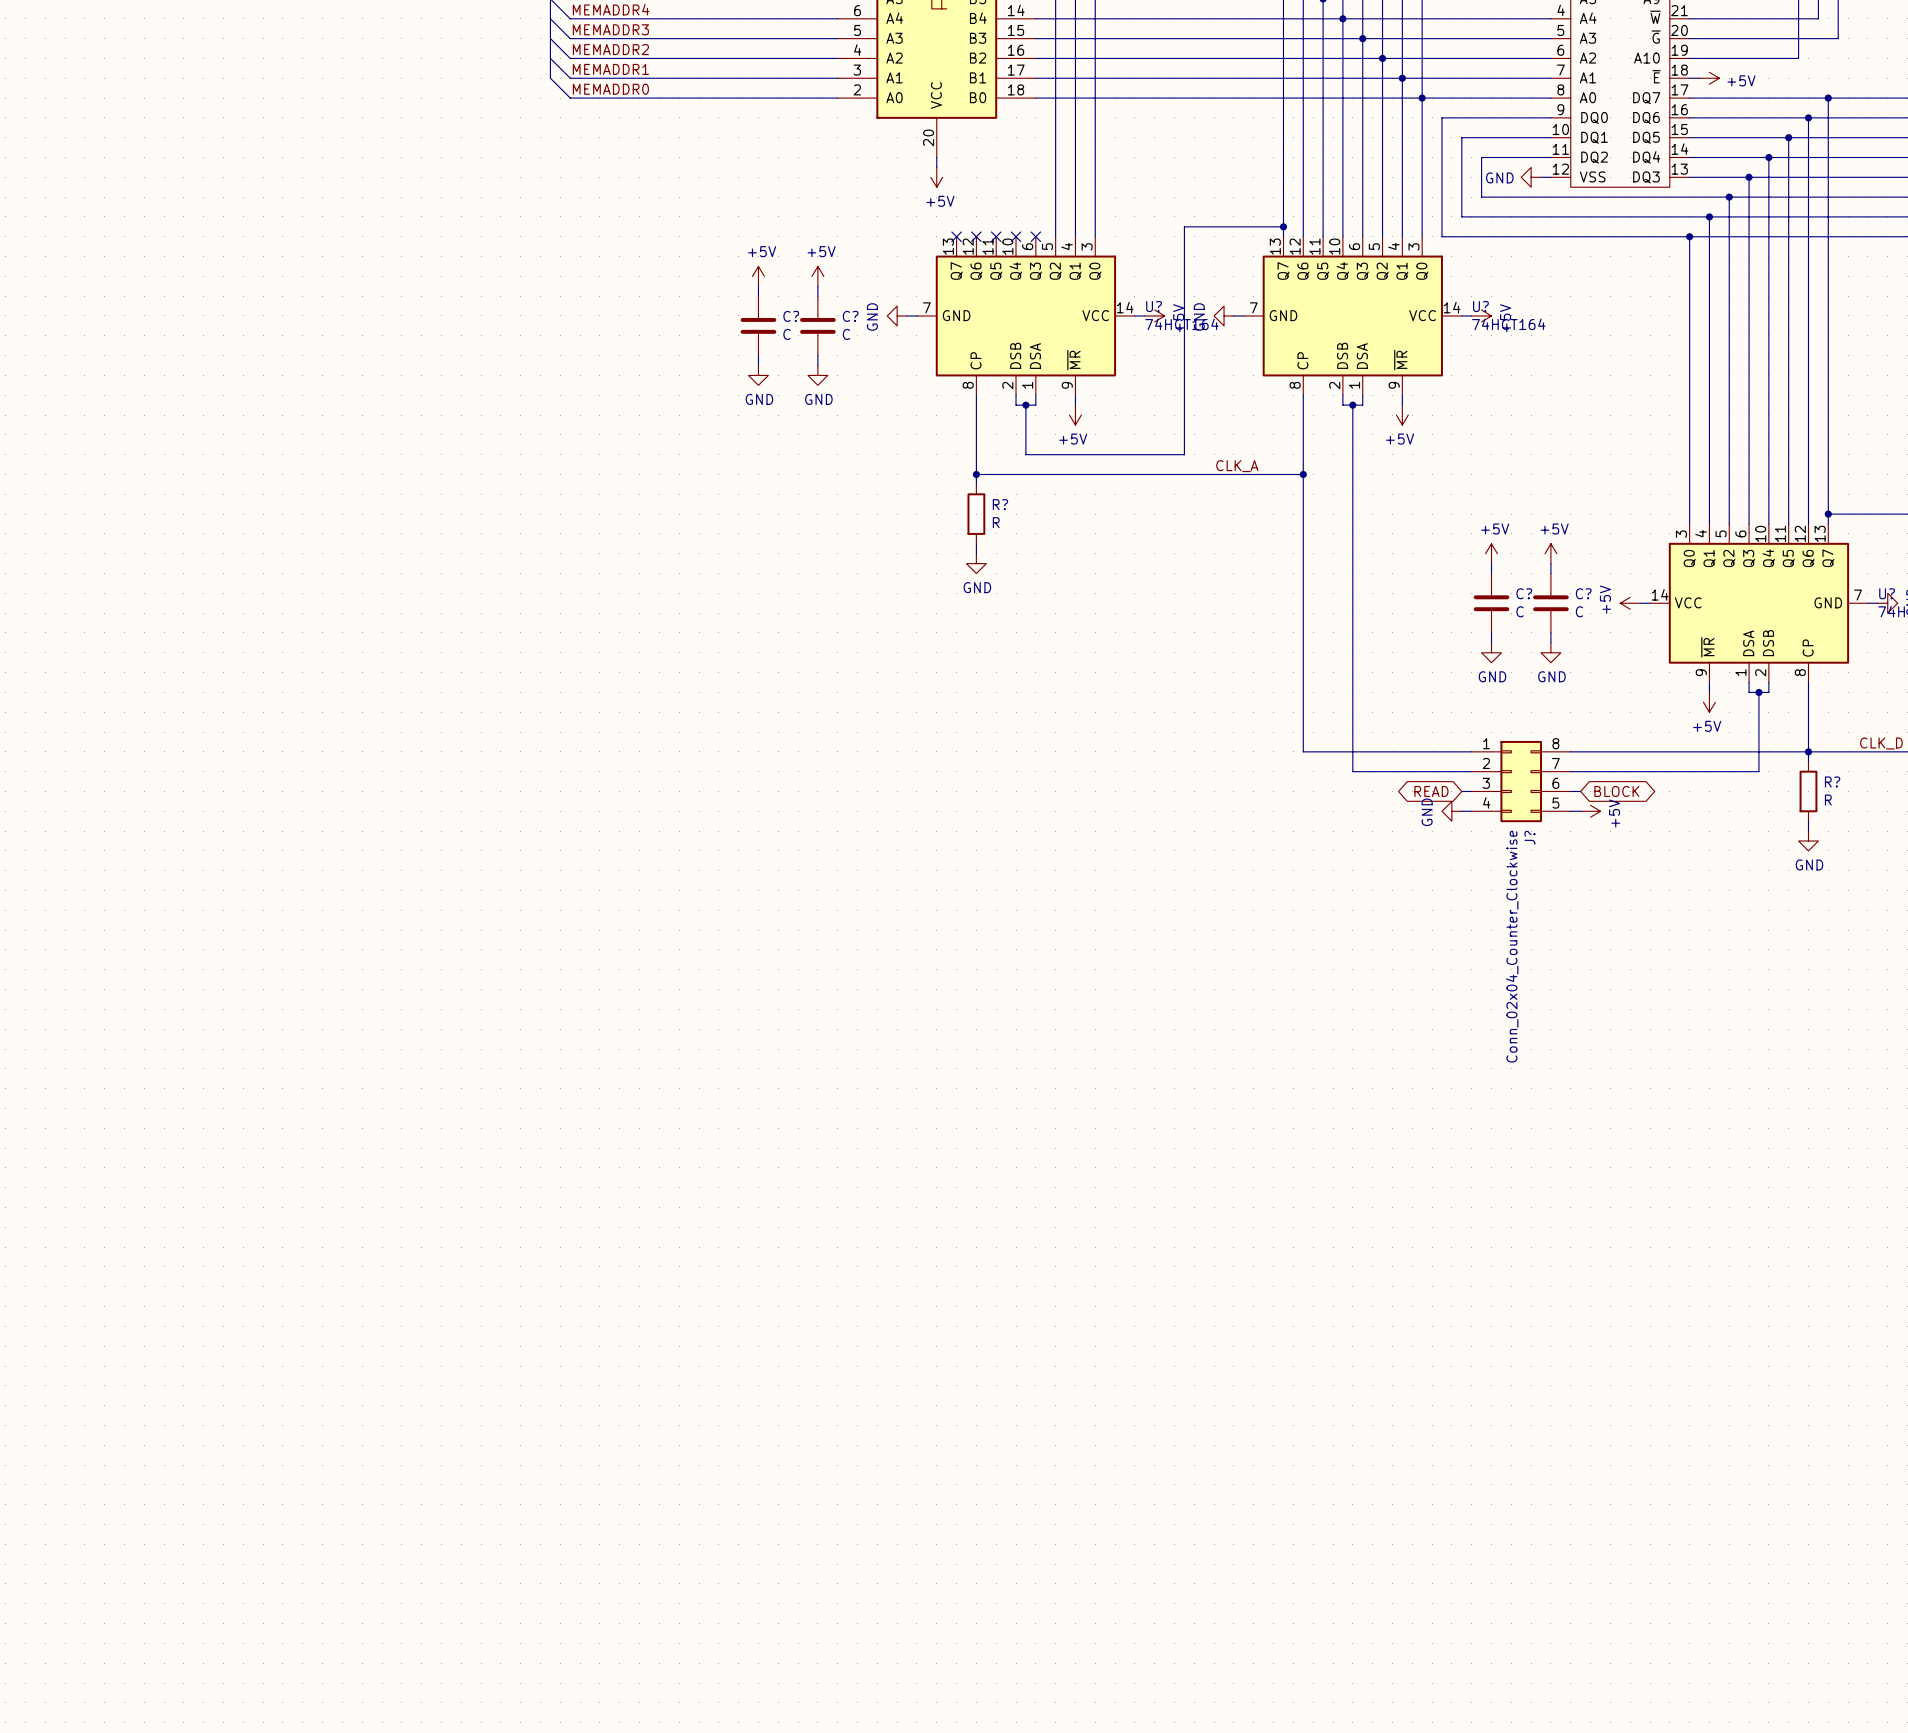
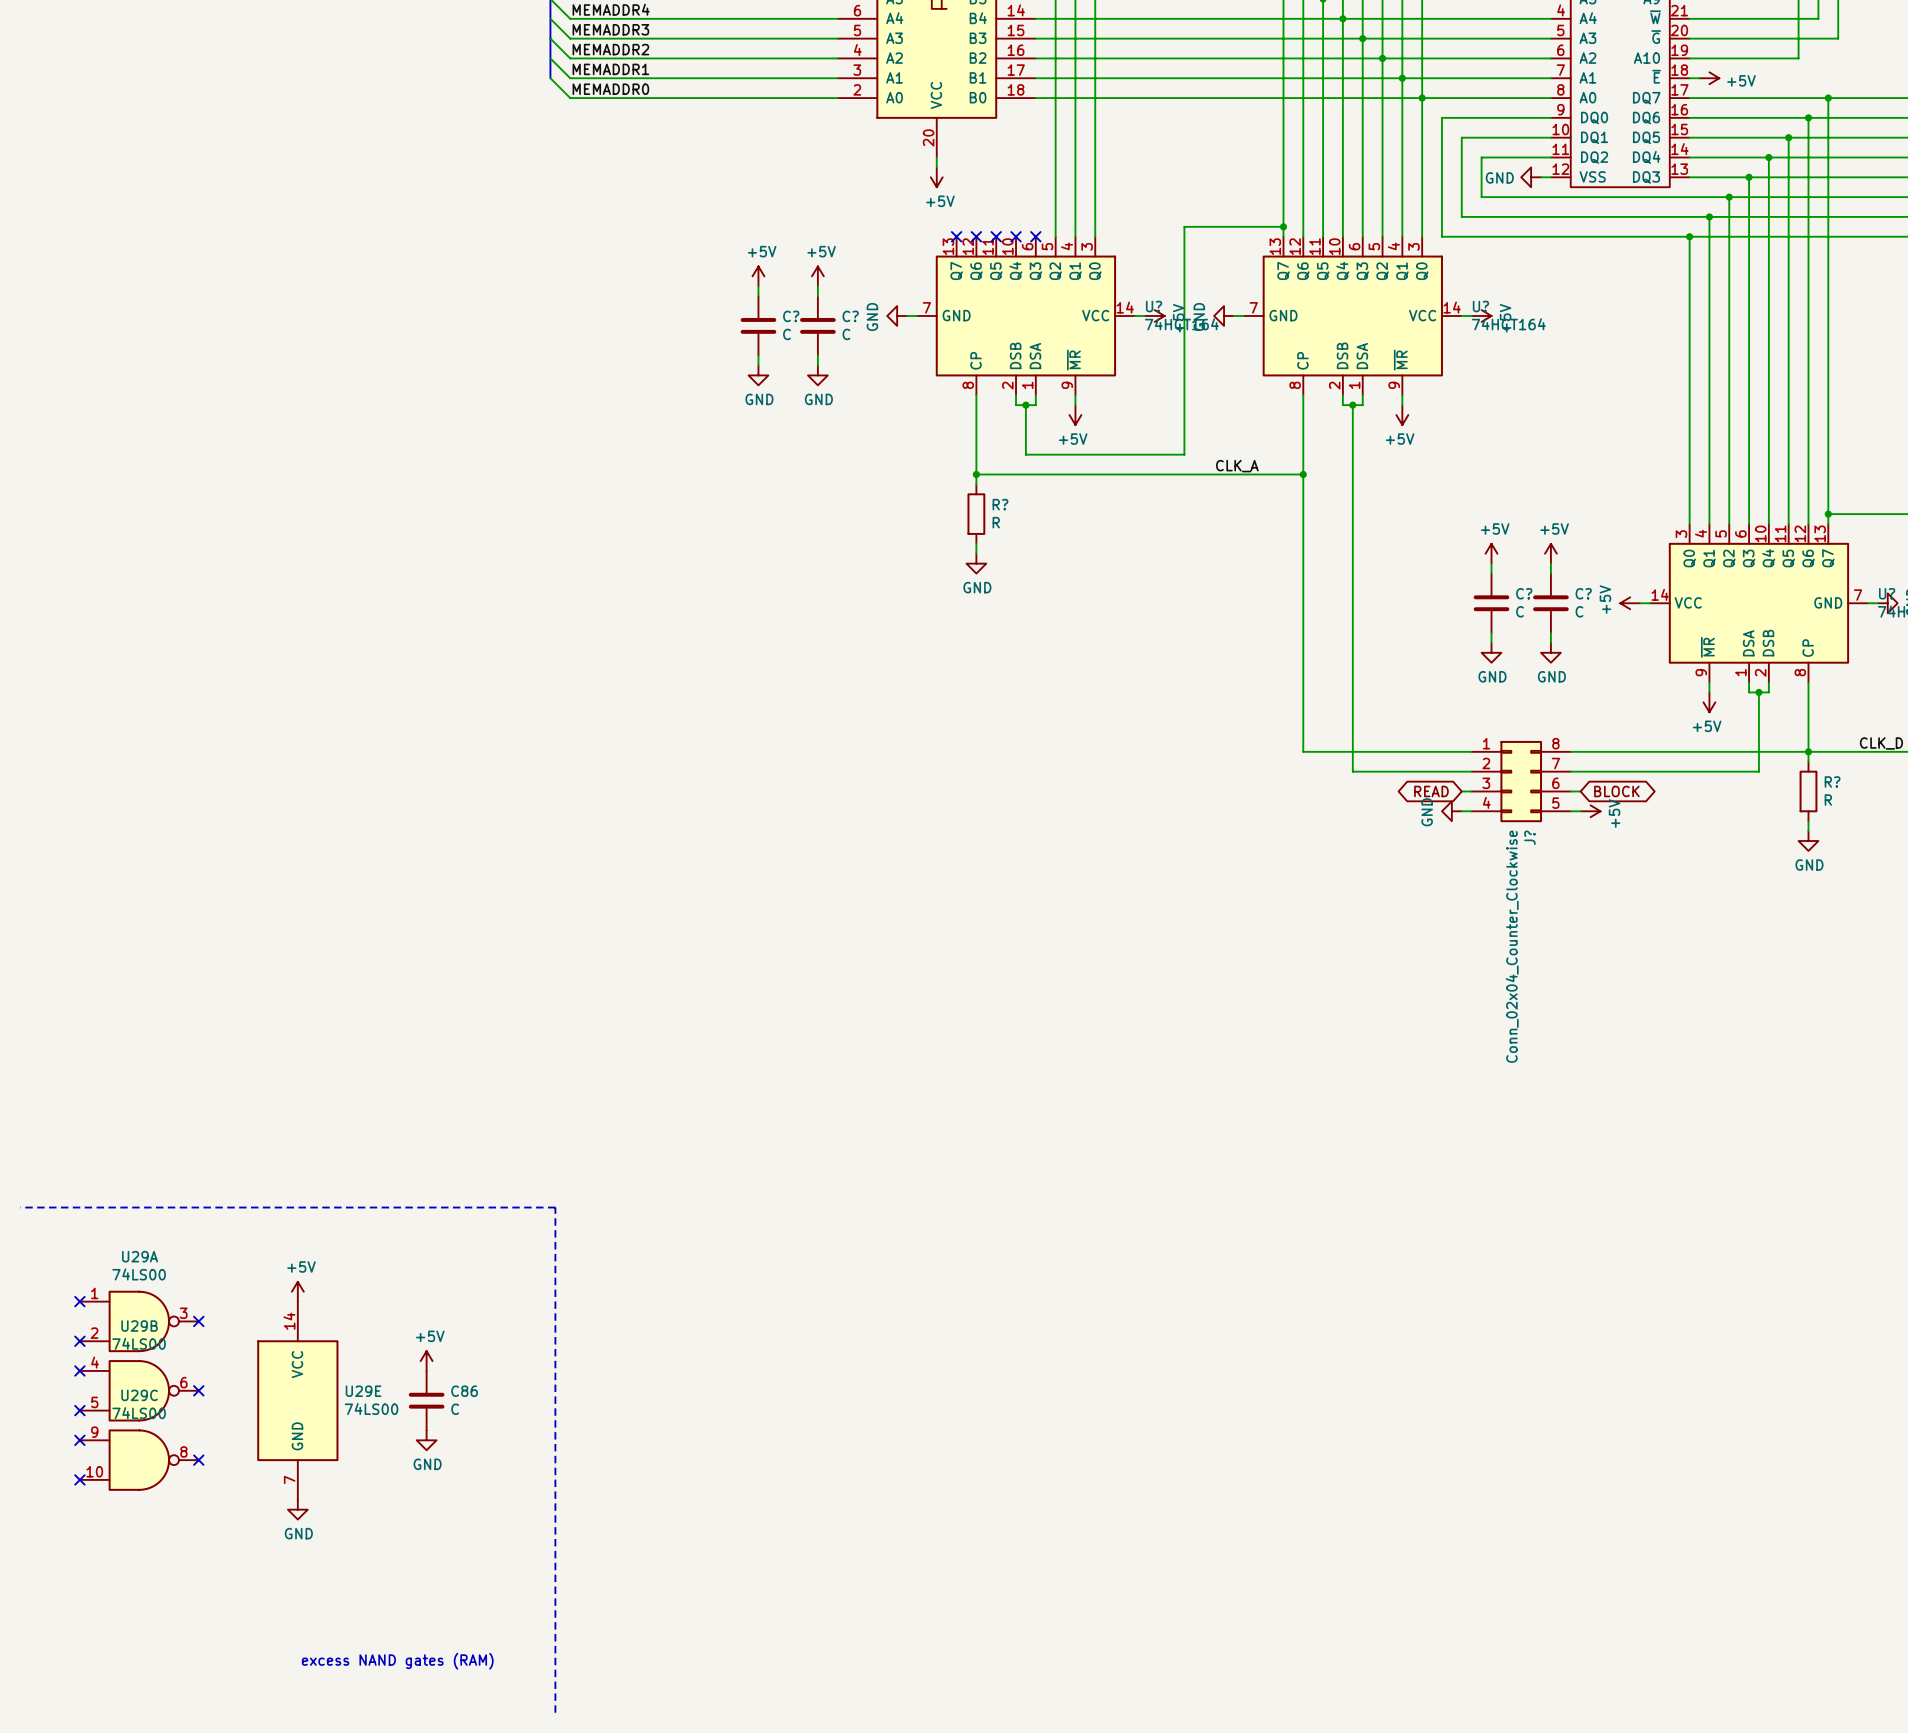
line: none -> (20, 1207) (555, 1207) (555, 1712)
power symbol: none -> +5V (297, 1291)
no-connect mark: none -> (79, 1301)
U29A: none -> 74LS00 (139, 1321)
no-connect mark: none -> (198, 1321)
no-connect mark: none -> (79, 1341)
power symbol: none -> +5V (426, 1361)
no-connect mark: none -> (79, 1370)
U29B: none -> 74LS00 (139, 1390)
no-connect mark: none -> (198, 1390)
U29E: none -> 74LS00 (297, 1400)
C86: none -> C (426, 1400)
no-connect mark: none -> (79, 1410)
no-connect mark: none -> (79, 1440)
power symbol: none -> GND (426, 1440)
U29C: none -> 74LS00 (139, 1460)
no-connect mark: none -> (198, 1460)
no-connect mark: none -> (79, 1479)
power symbol: none -> GND (297, 1509)
text: none -> excess NAND gates (RAM) (397, 1661)

